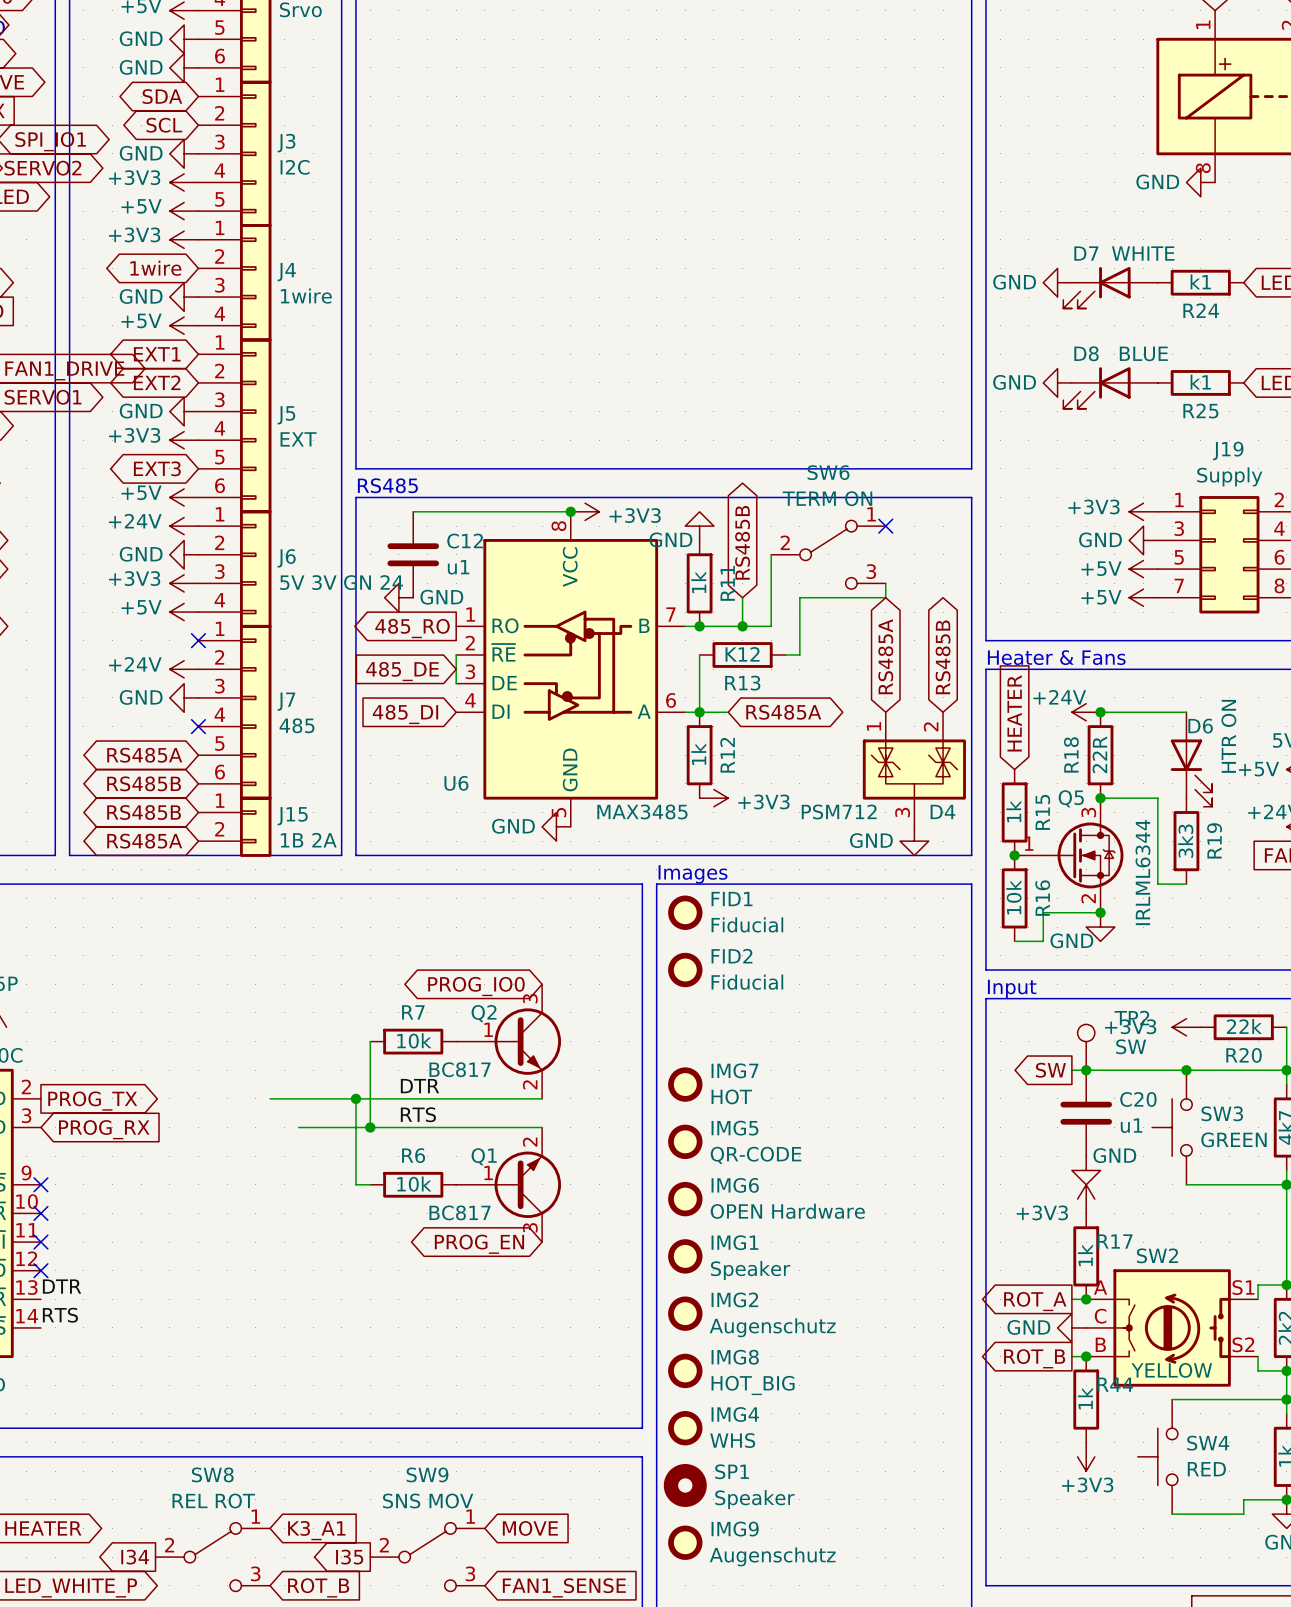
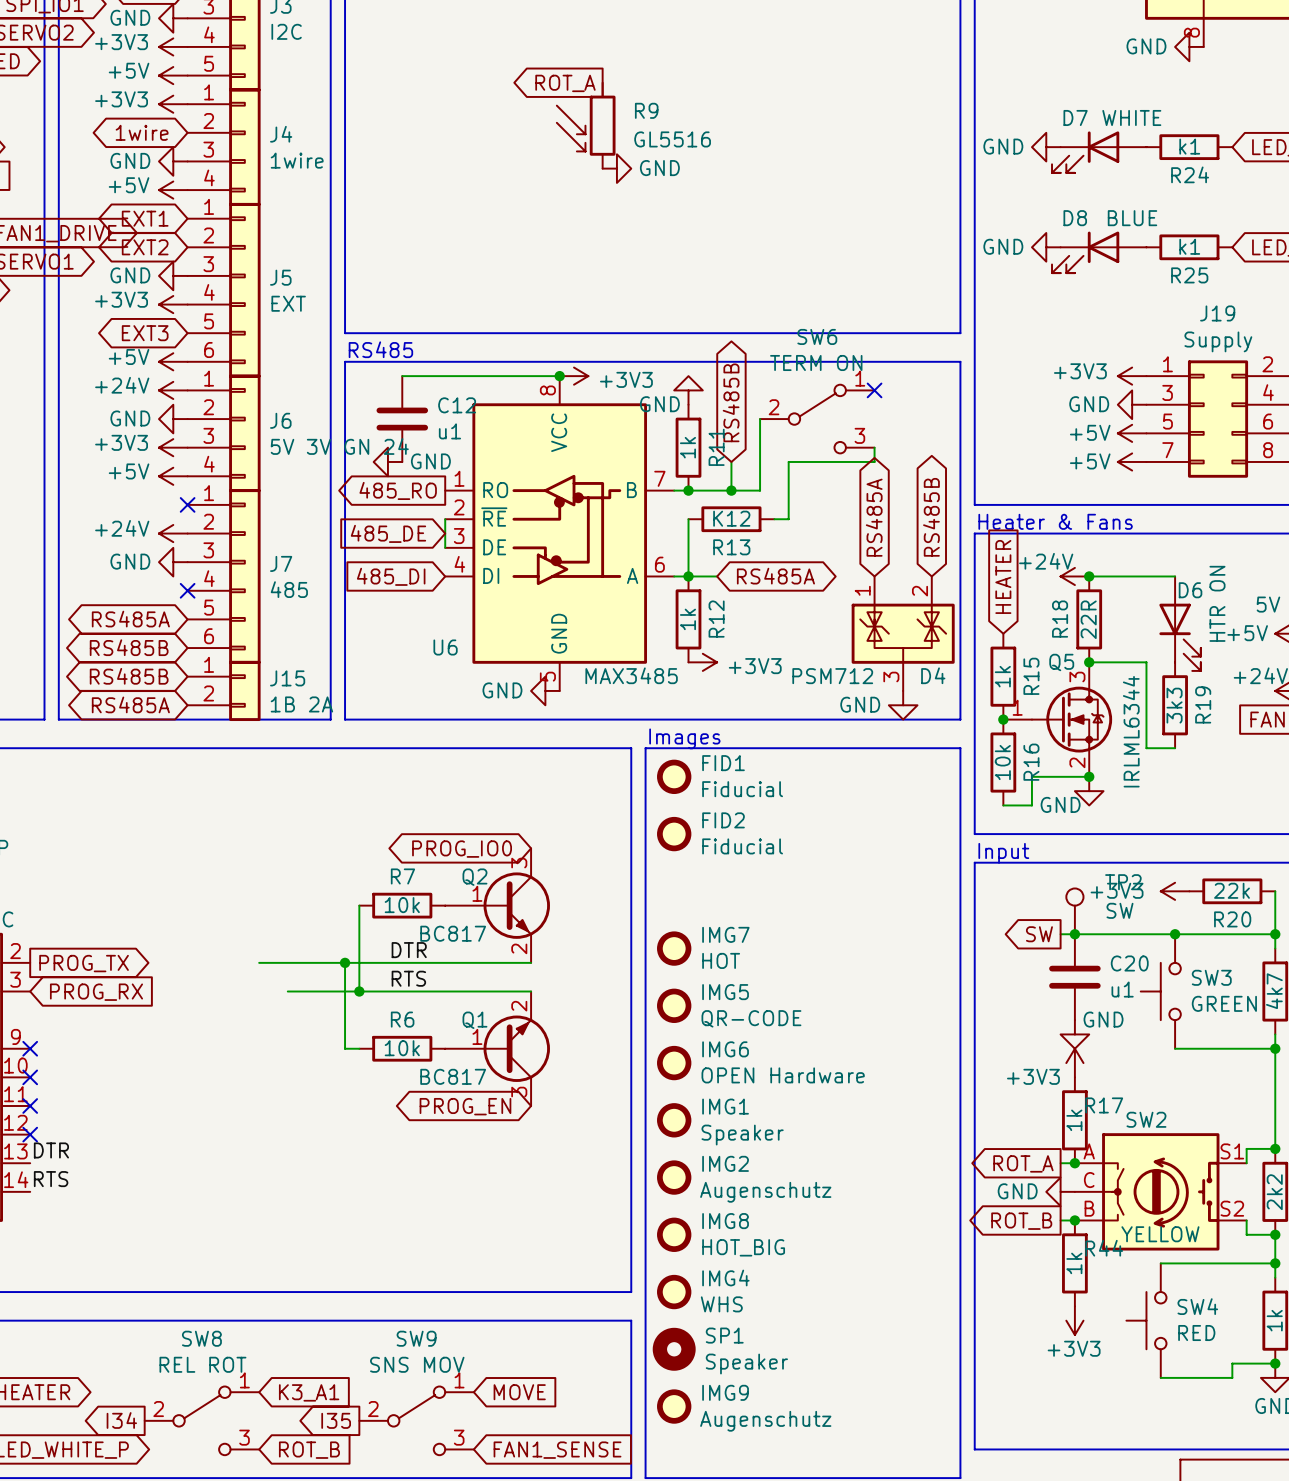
global label: none -> ROT_A (565, 83)
R9: none -> GL5516 (586, 125)
power symbol: none -> GND (616, 168)

